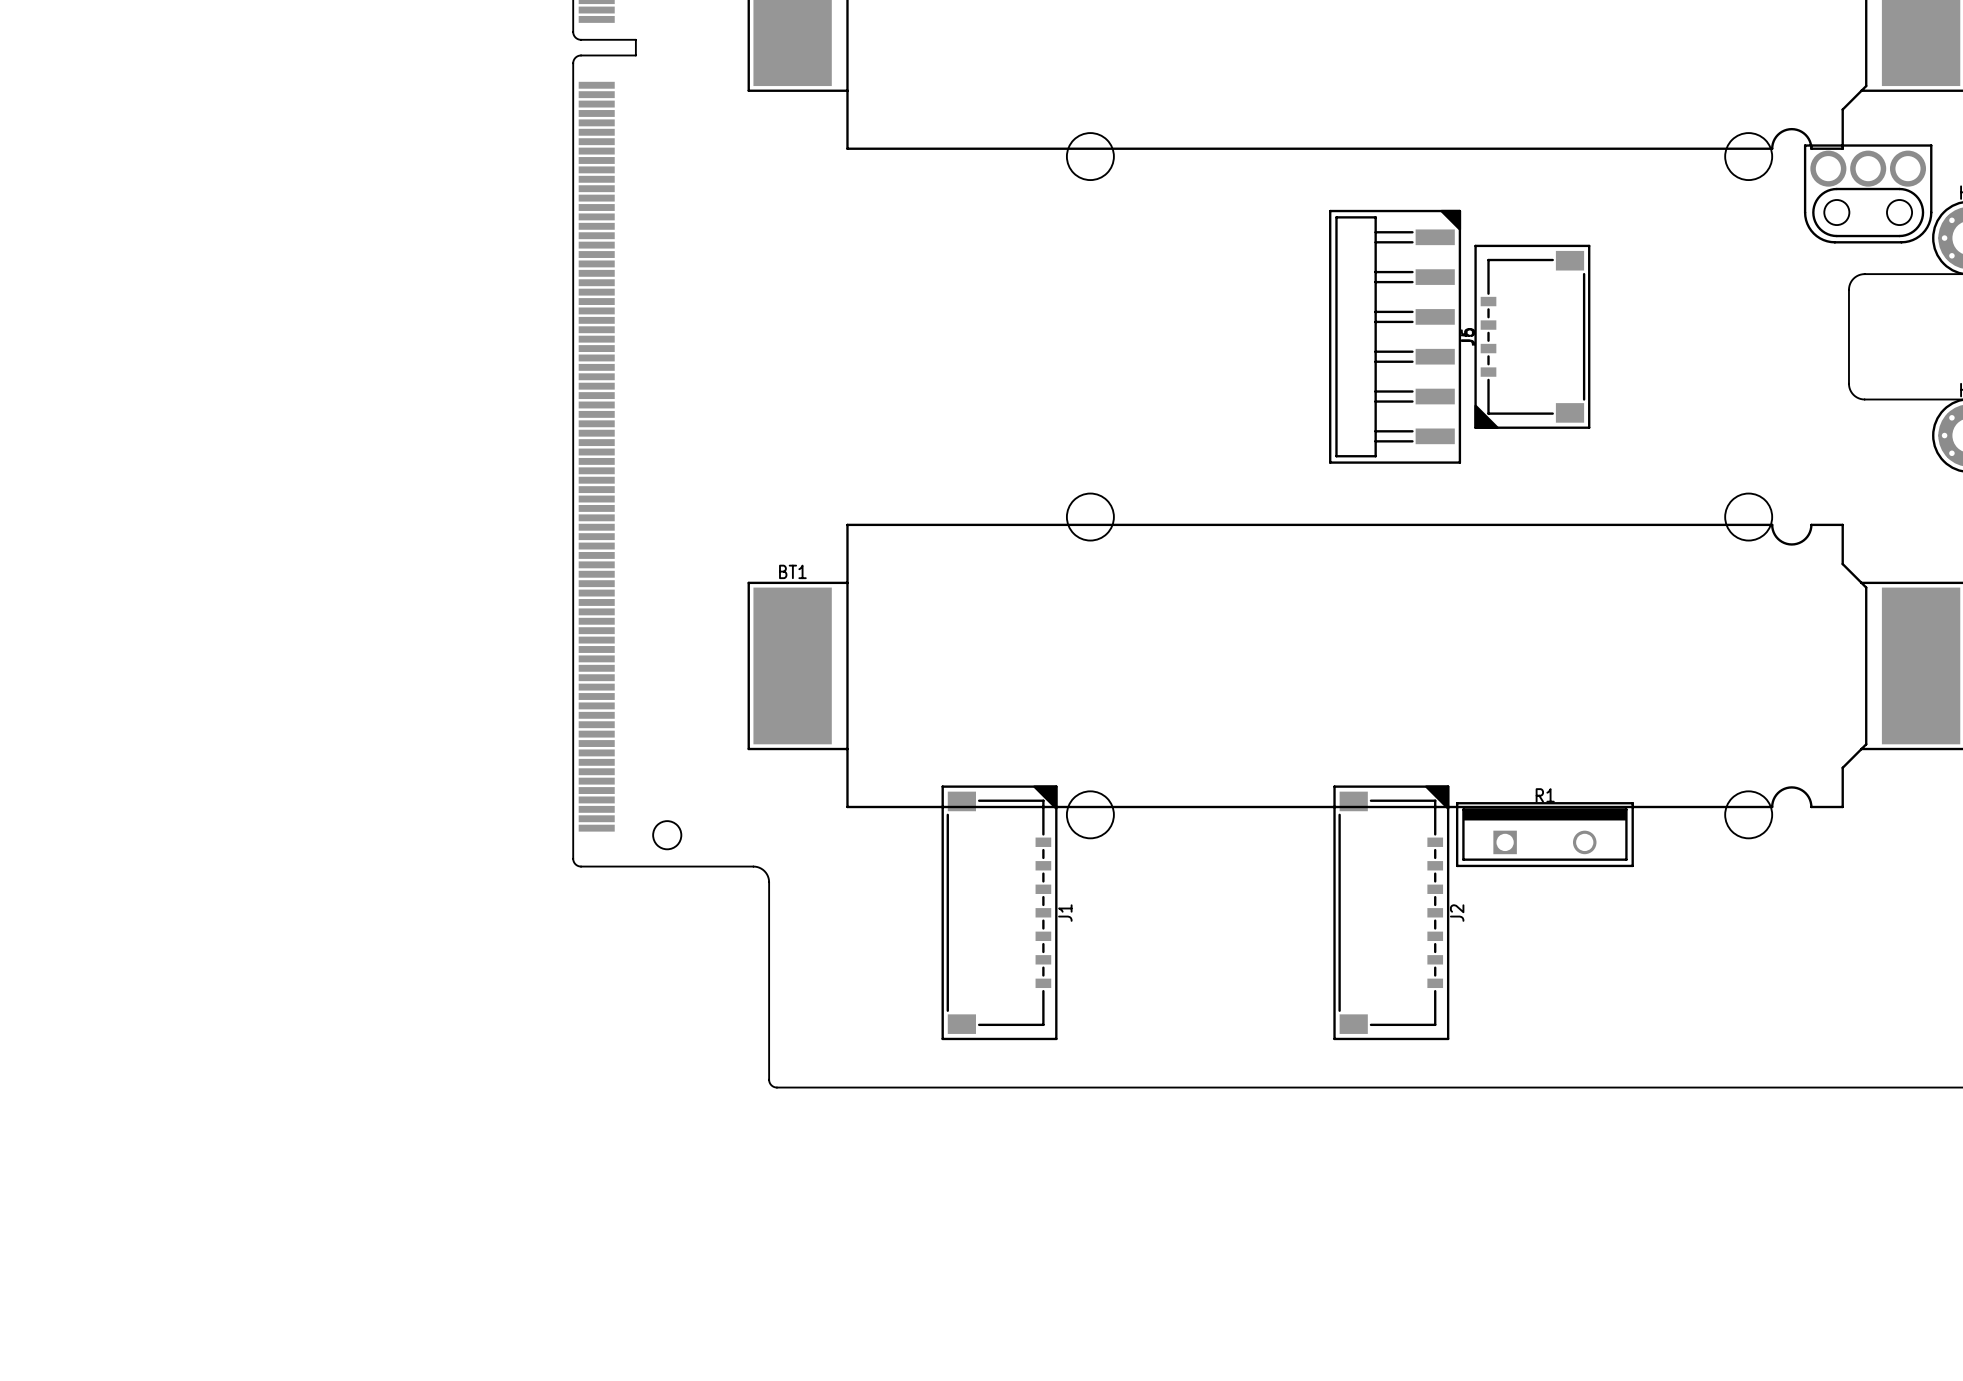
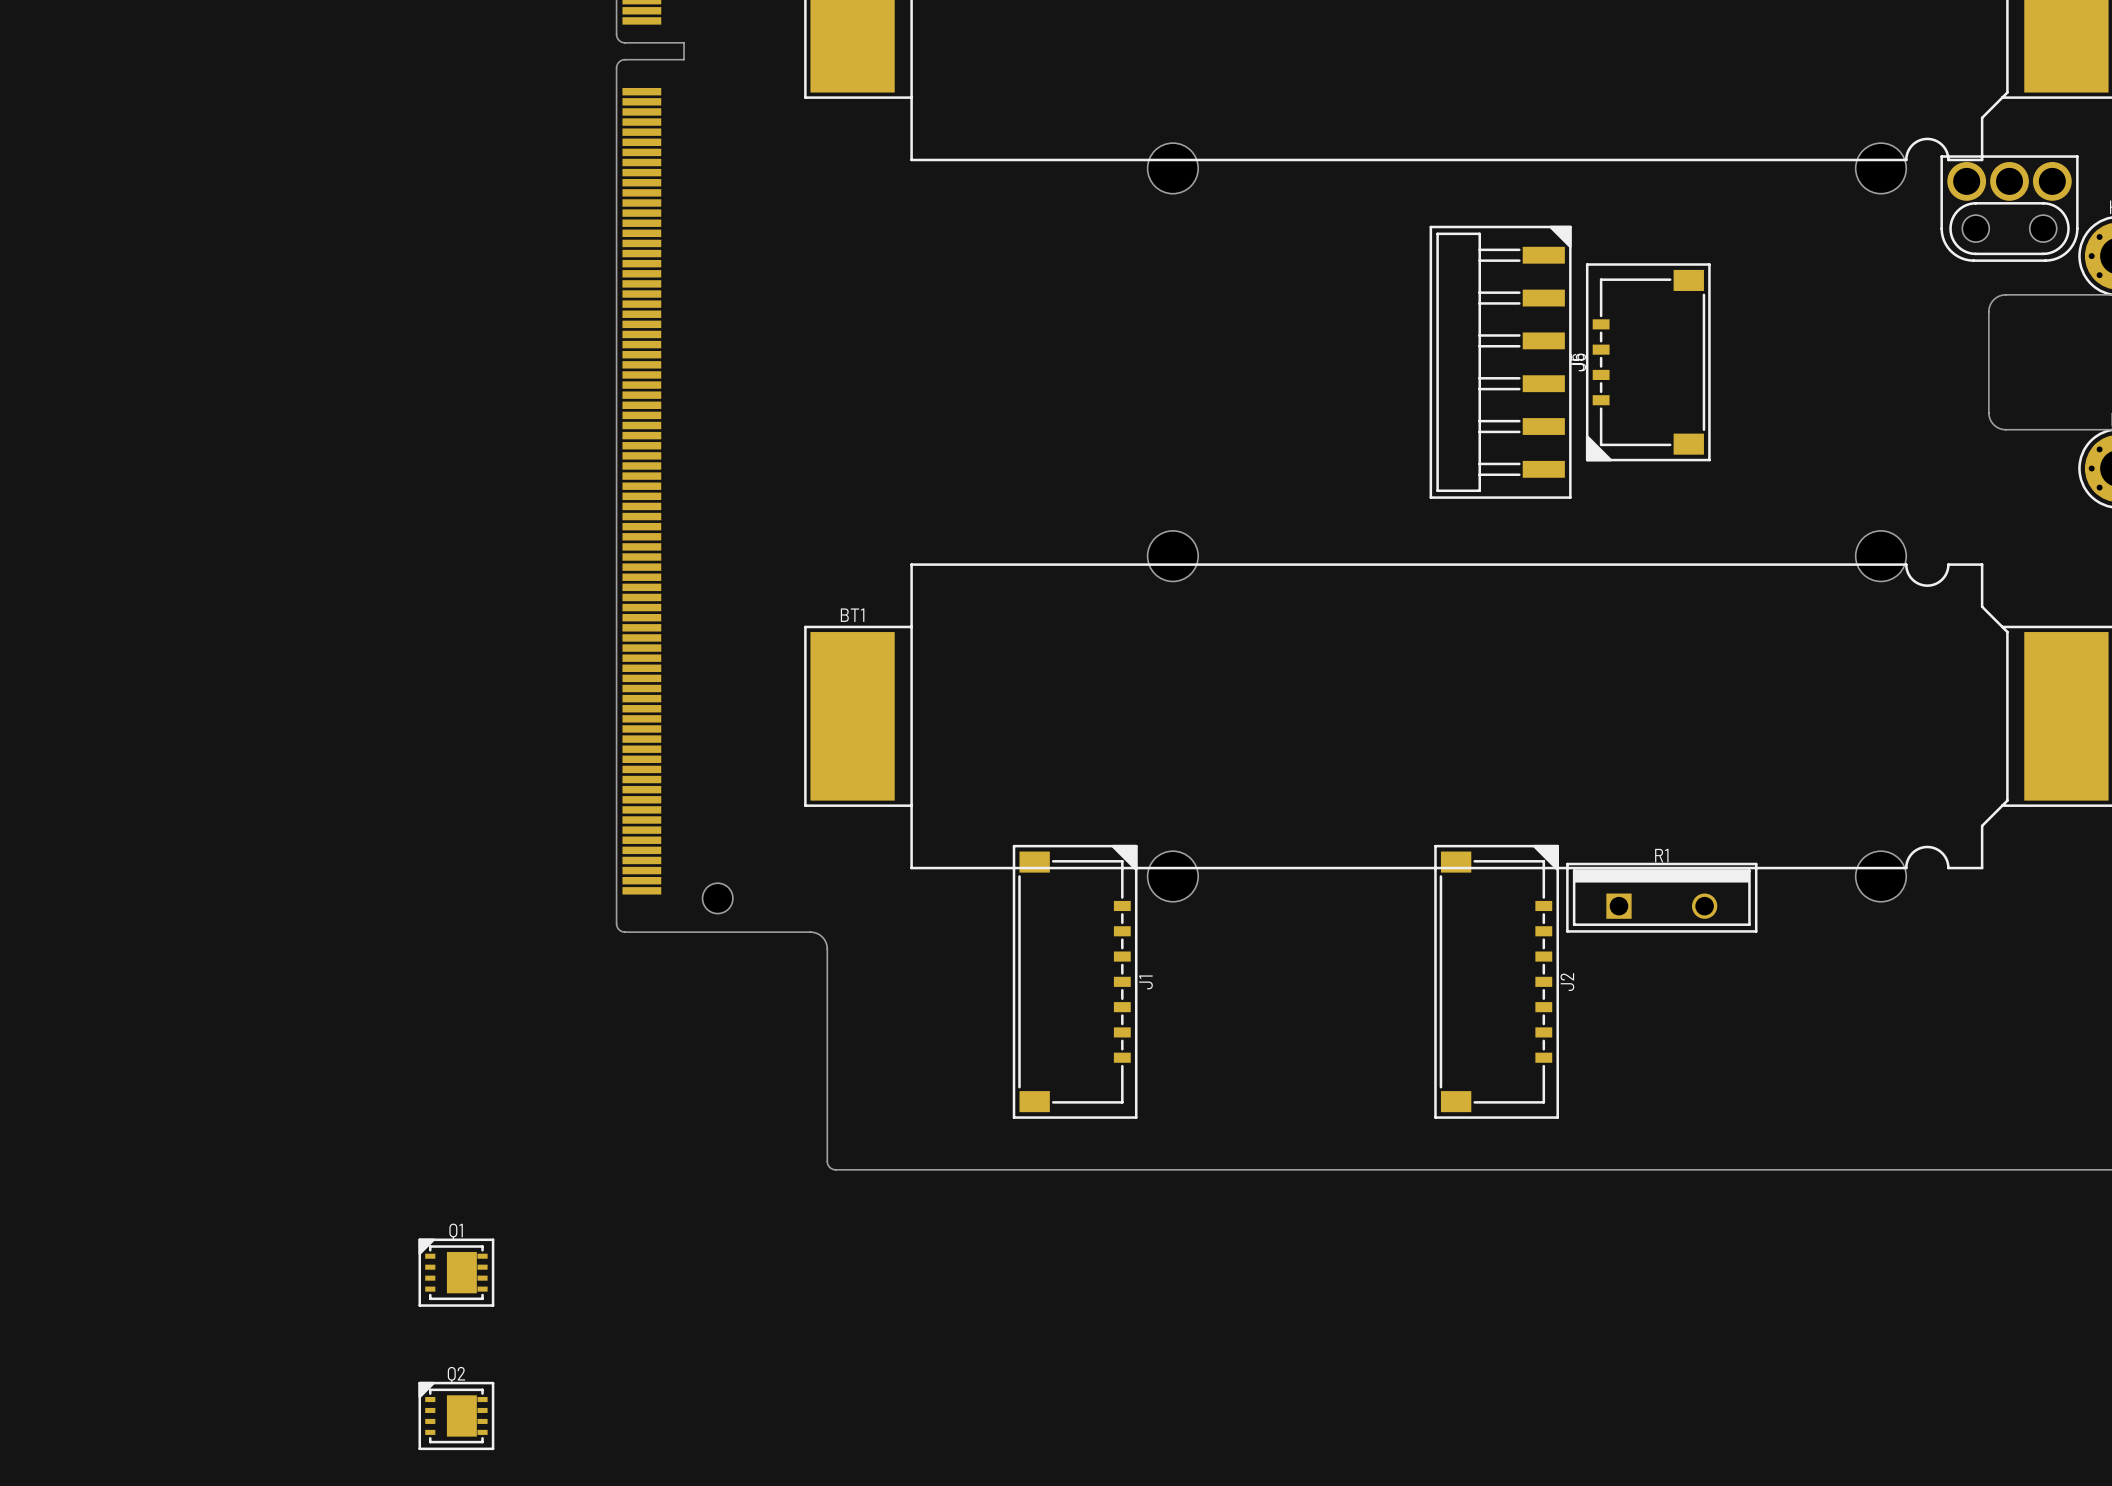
Q1: none -> (456, 1272)
Q2: none -> (456, 1415)

